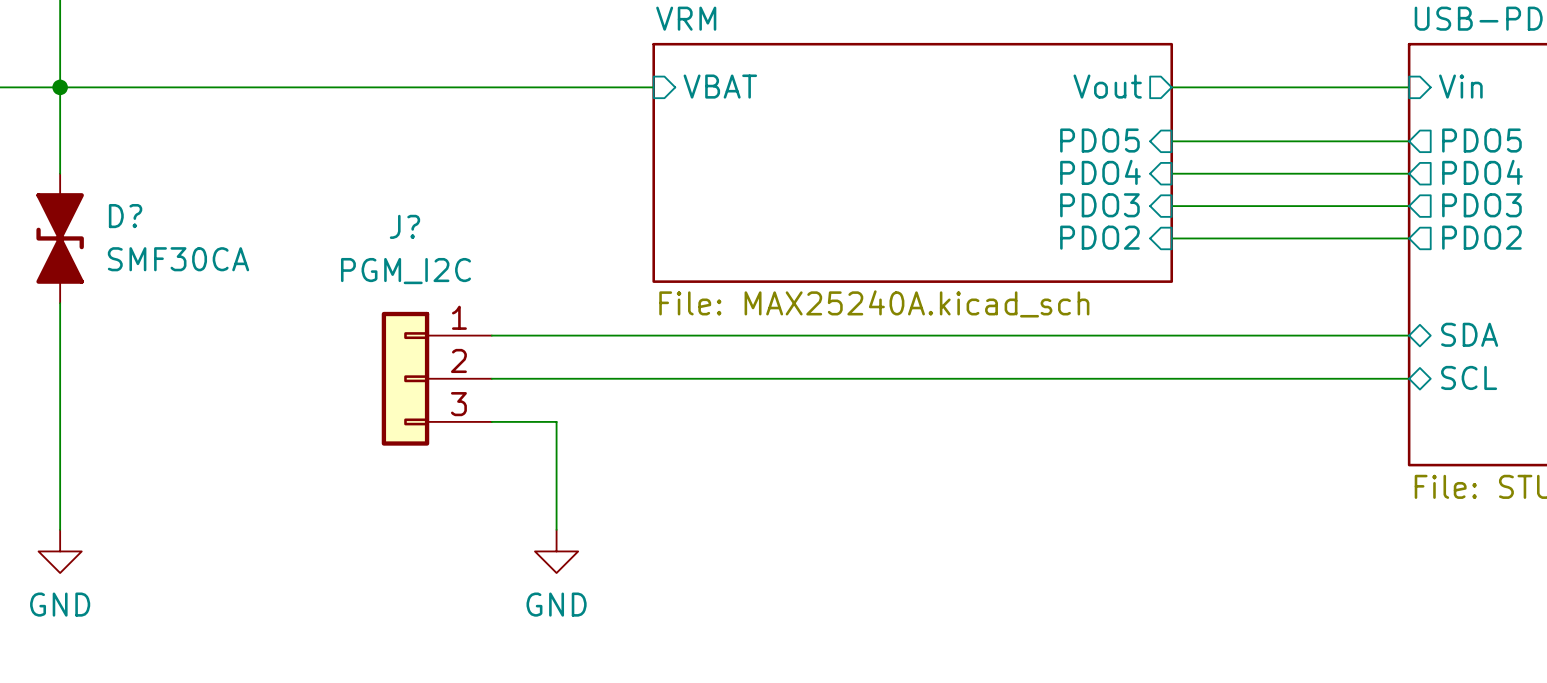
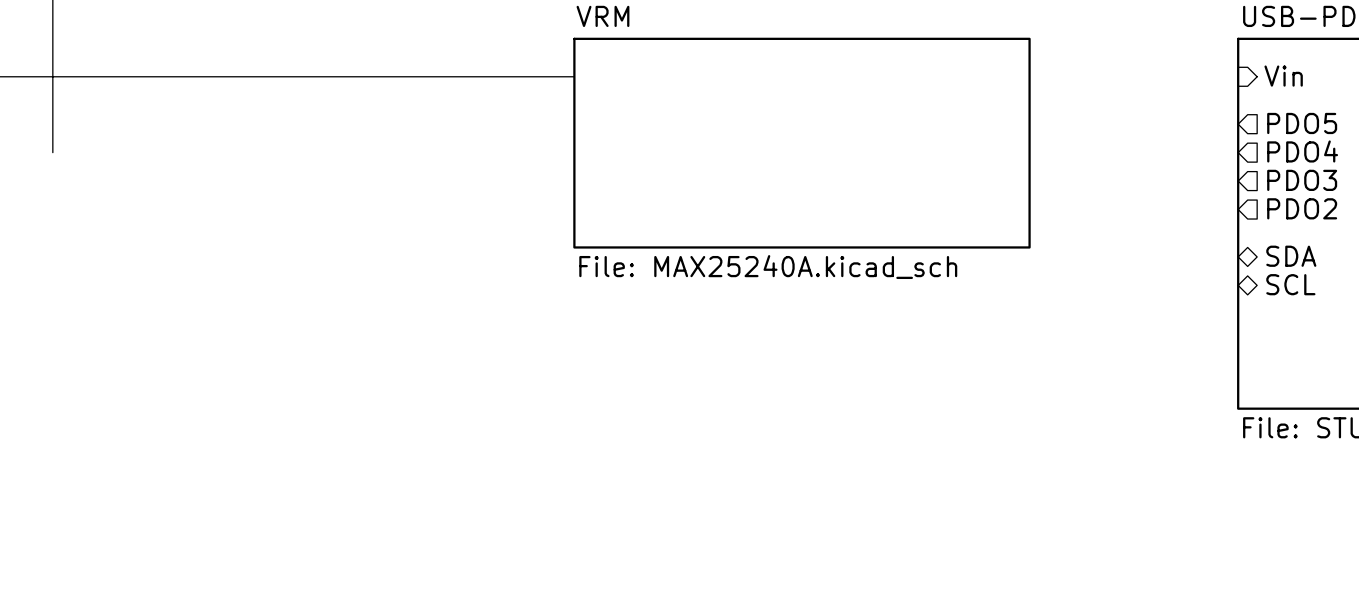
sheet pin: VBAT (720, 86) -> none
sheet pin: Vout (1107, 86) -> none
junction: (60, 87) -> none
wire: (1171, 87) (1409, 87) -> none
sheet pin: PDO5 (1099, 140) -> none
wire: (1171, 141) (1409, 141) -> none
sheet pin: PDO4 (1100, 172) -> none
wire: (1171, 173) (1409, 173) -> none
sheet pin: PDO3 (1099, 205) -> none
wire: (1171, 206) (1409, 206) -> none
sheet pin: PDO2 (1099, 237) -> none
D?: SMF30CA (60, 238) -> none
wire: (1171, 238) (1409, 238) -> none
wire: (60, 303) (60, 529) -> none
sheet pin position: SDA (1469, 334) -> SDA (1291, 256)
wire: (491, 335) (1409, 335) -> none
sheet pin position: SCL (1469, 377) -> SCL (1290, 284)
J?: PGM_I2C (436, 378) -> none
wire: (491, 378) (1409, 378) -> none
wire: (491, 421) (556, 421) (556, 529) -> none
power symbol: GND (60, 551) -> none
power symbol: GND (556, 551) -> none

